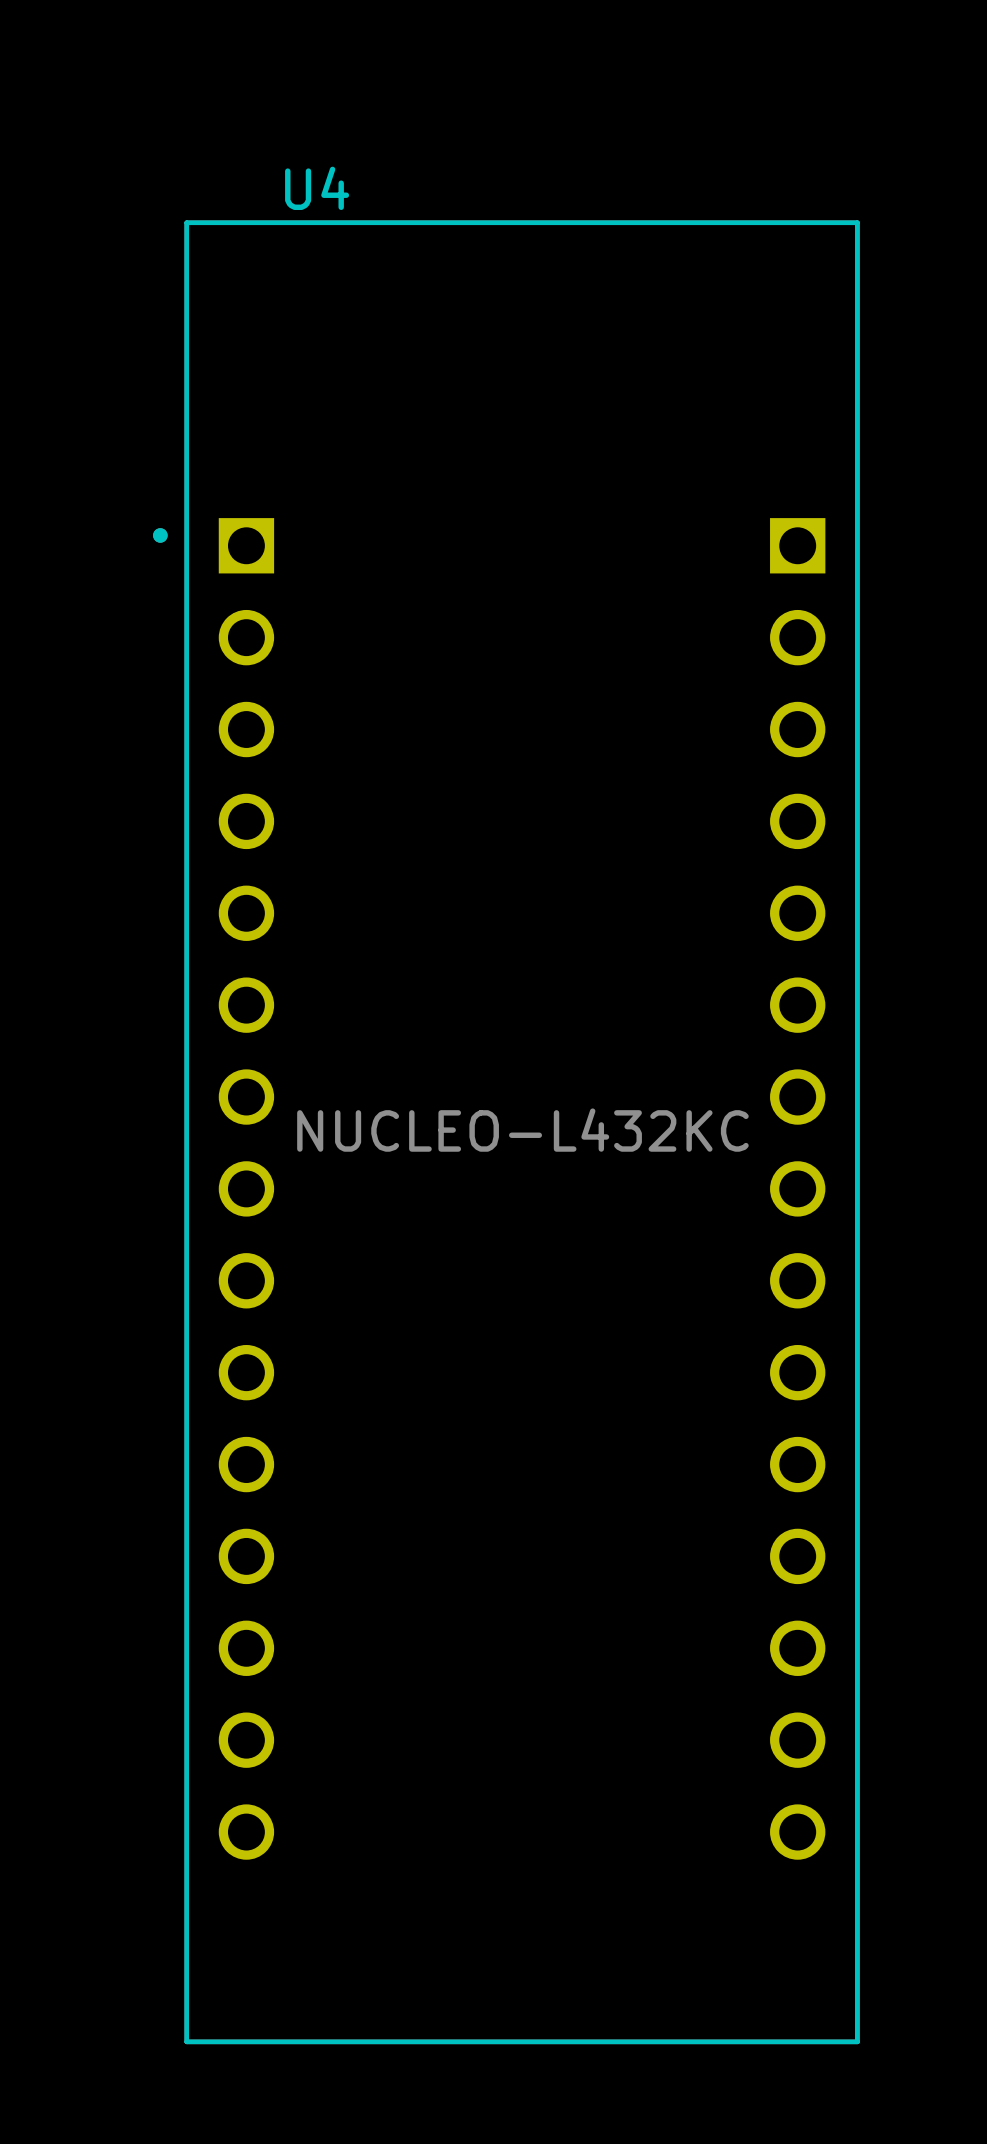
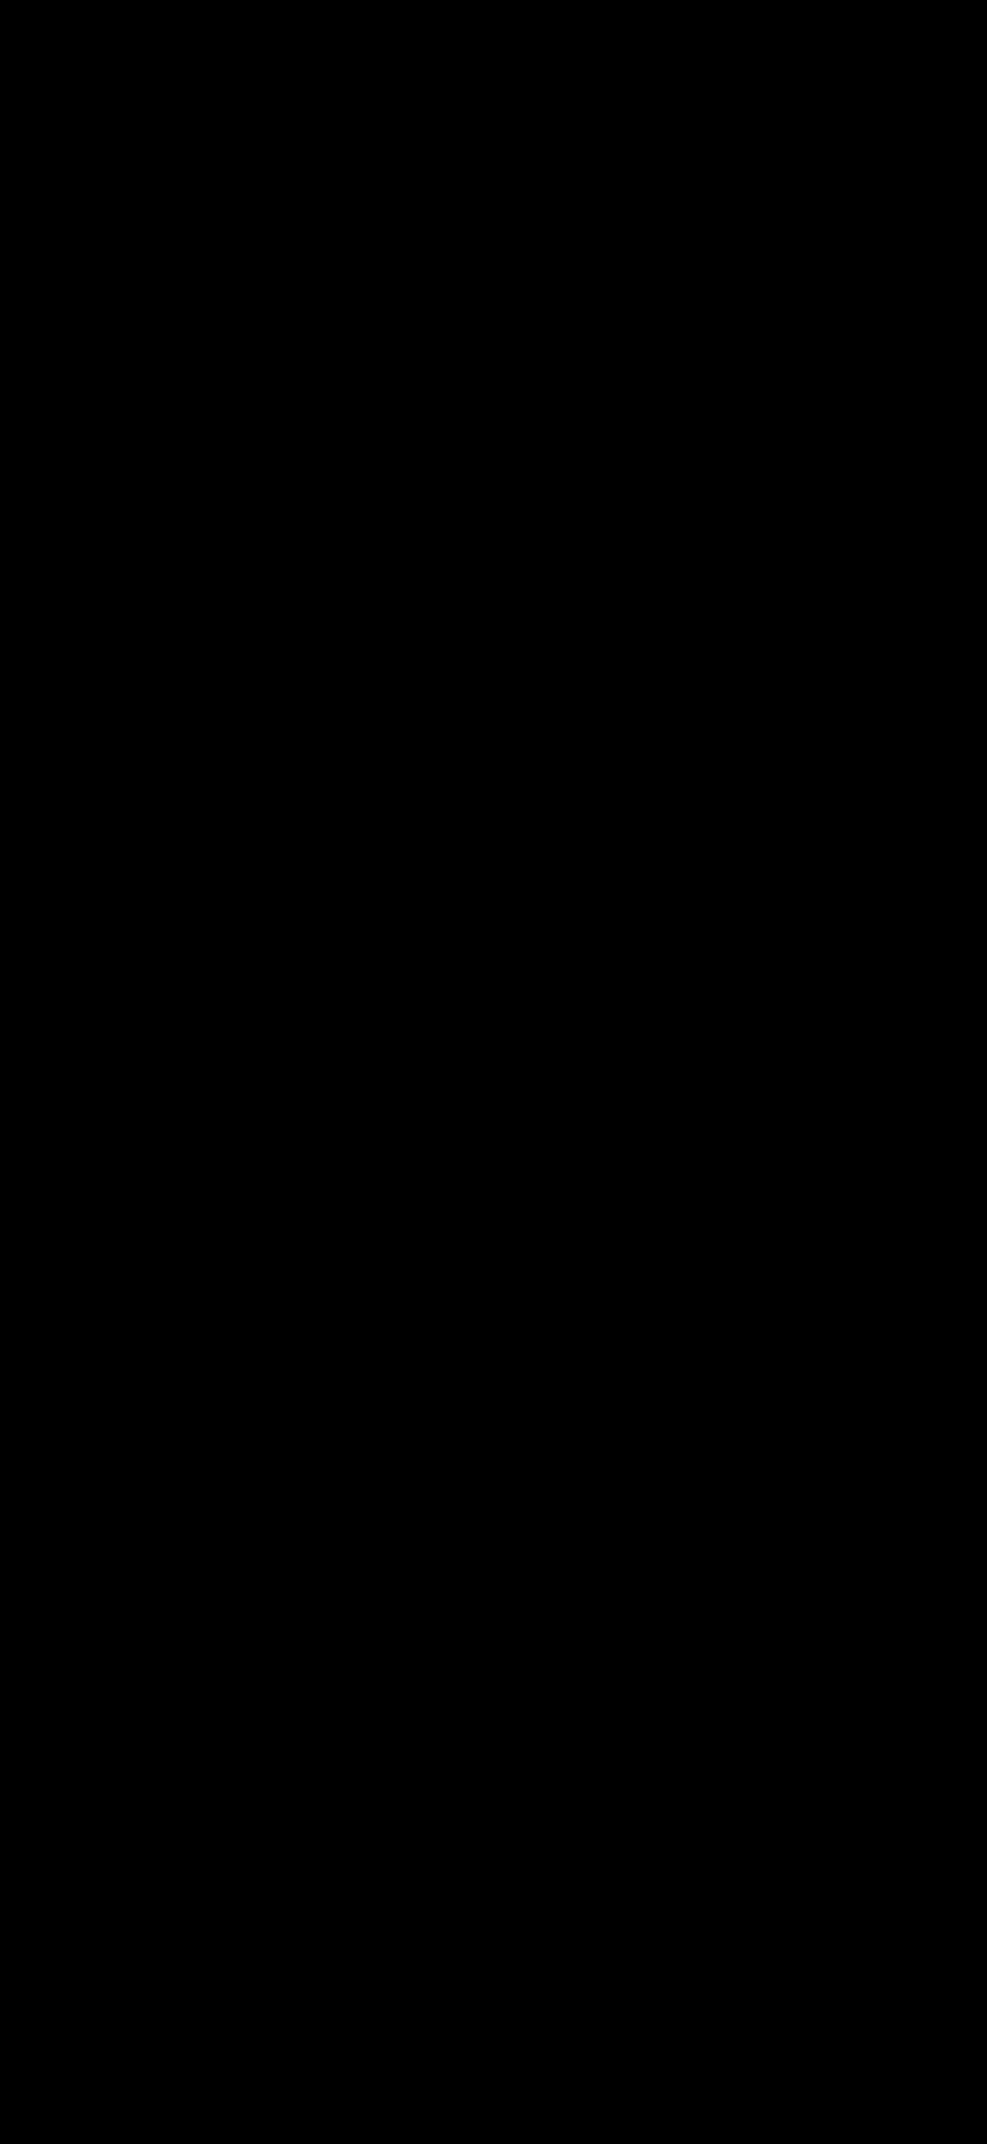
U4: NUCLEO-L432KC (506, 1132) -> none

